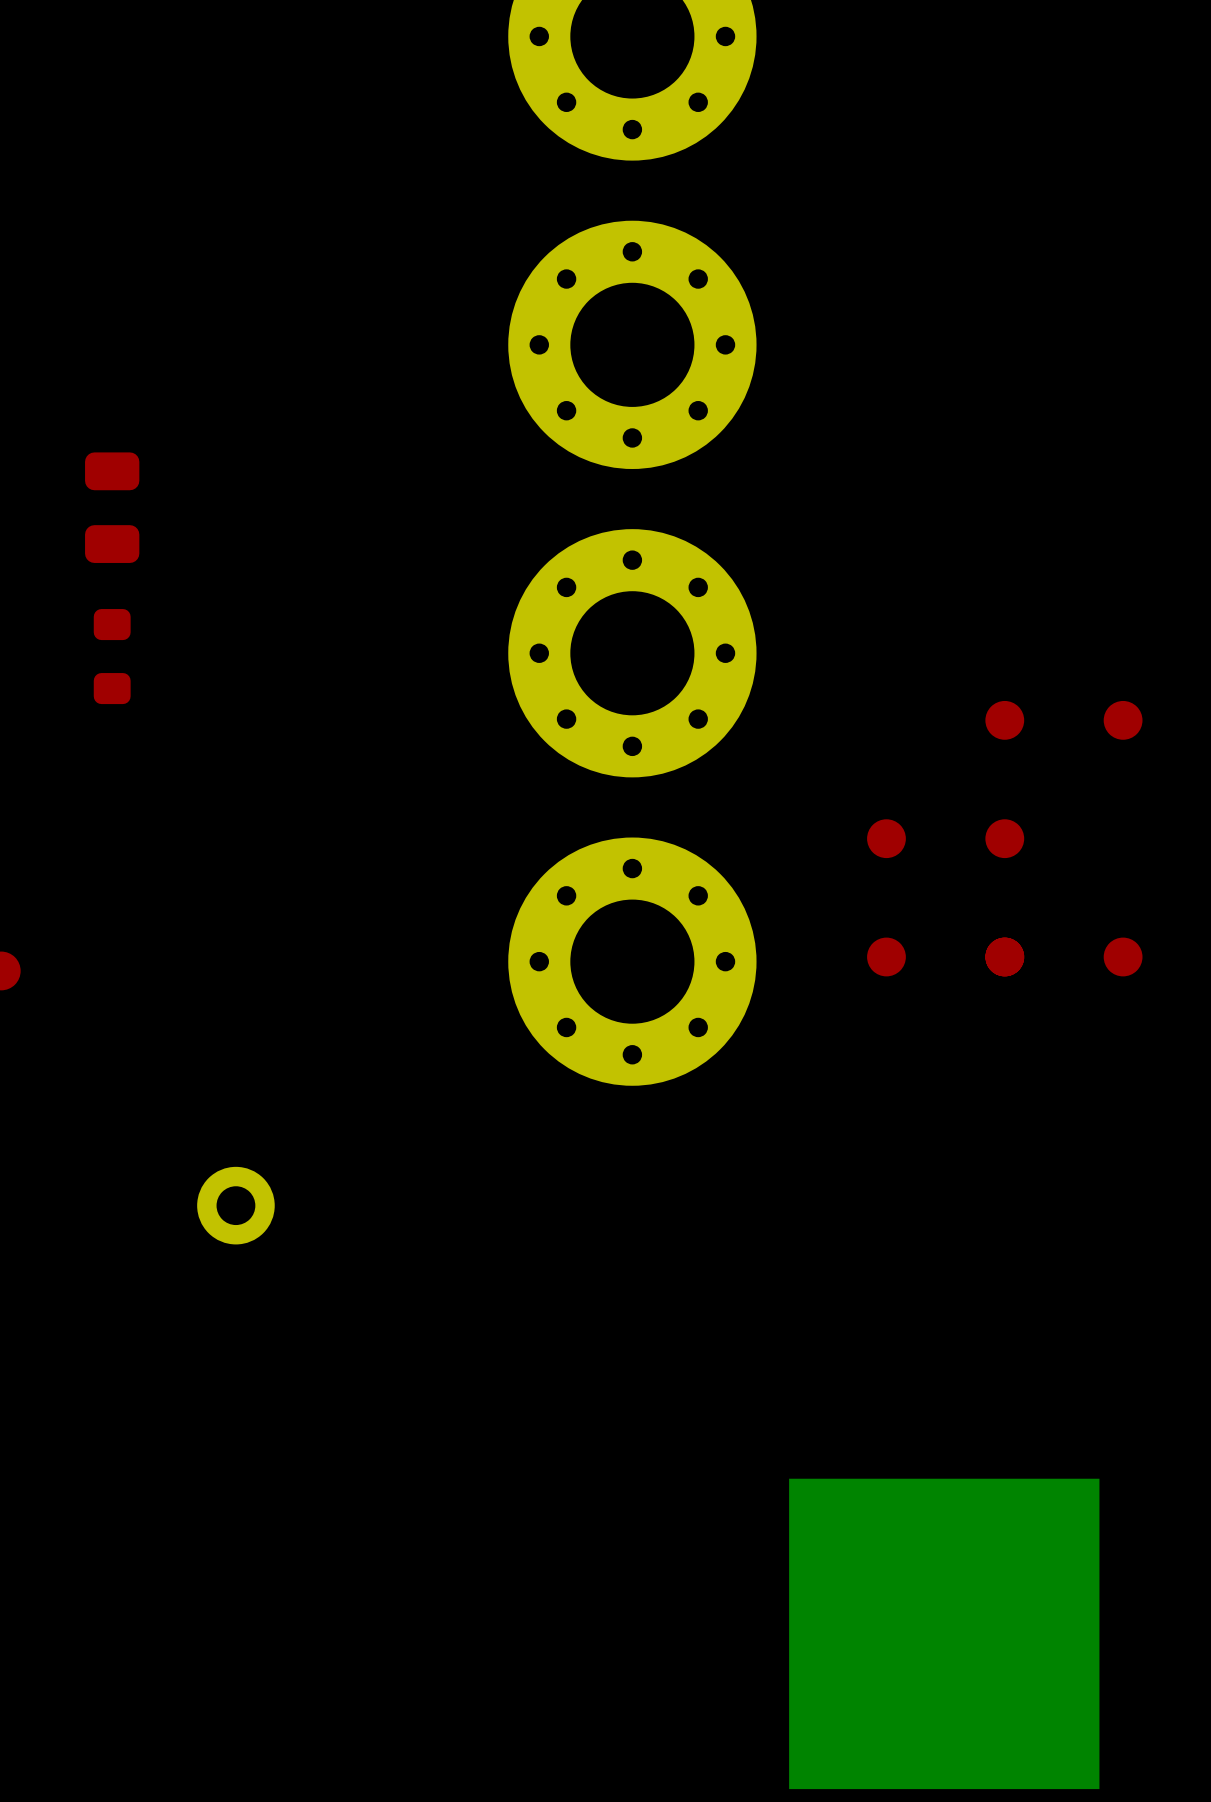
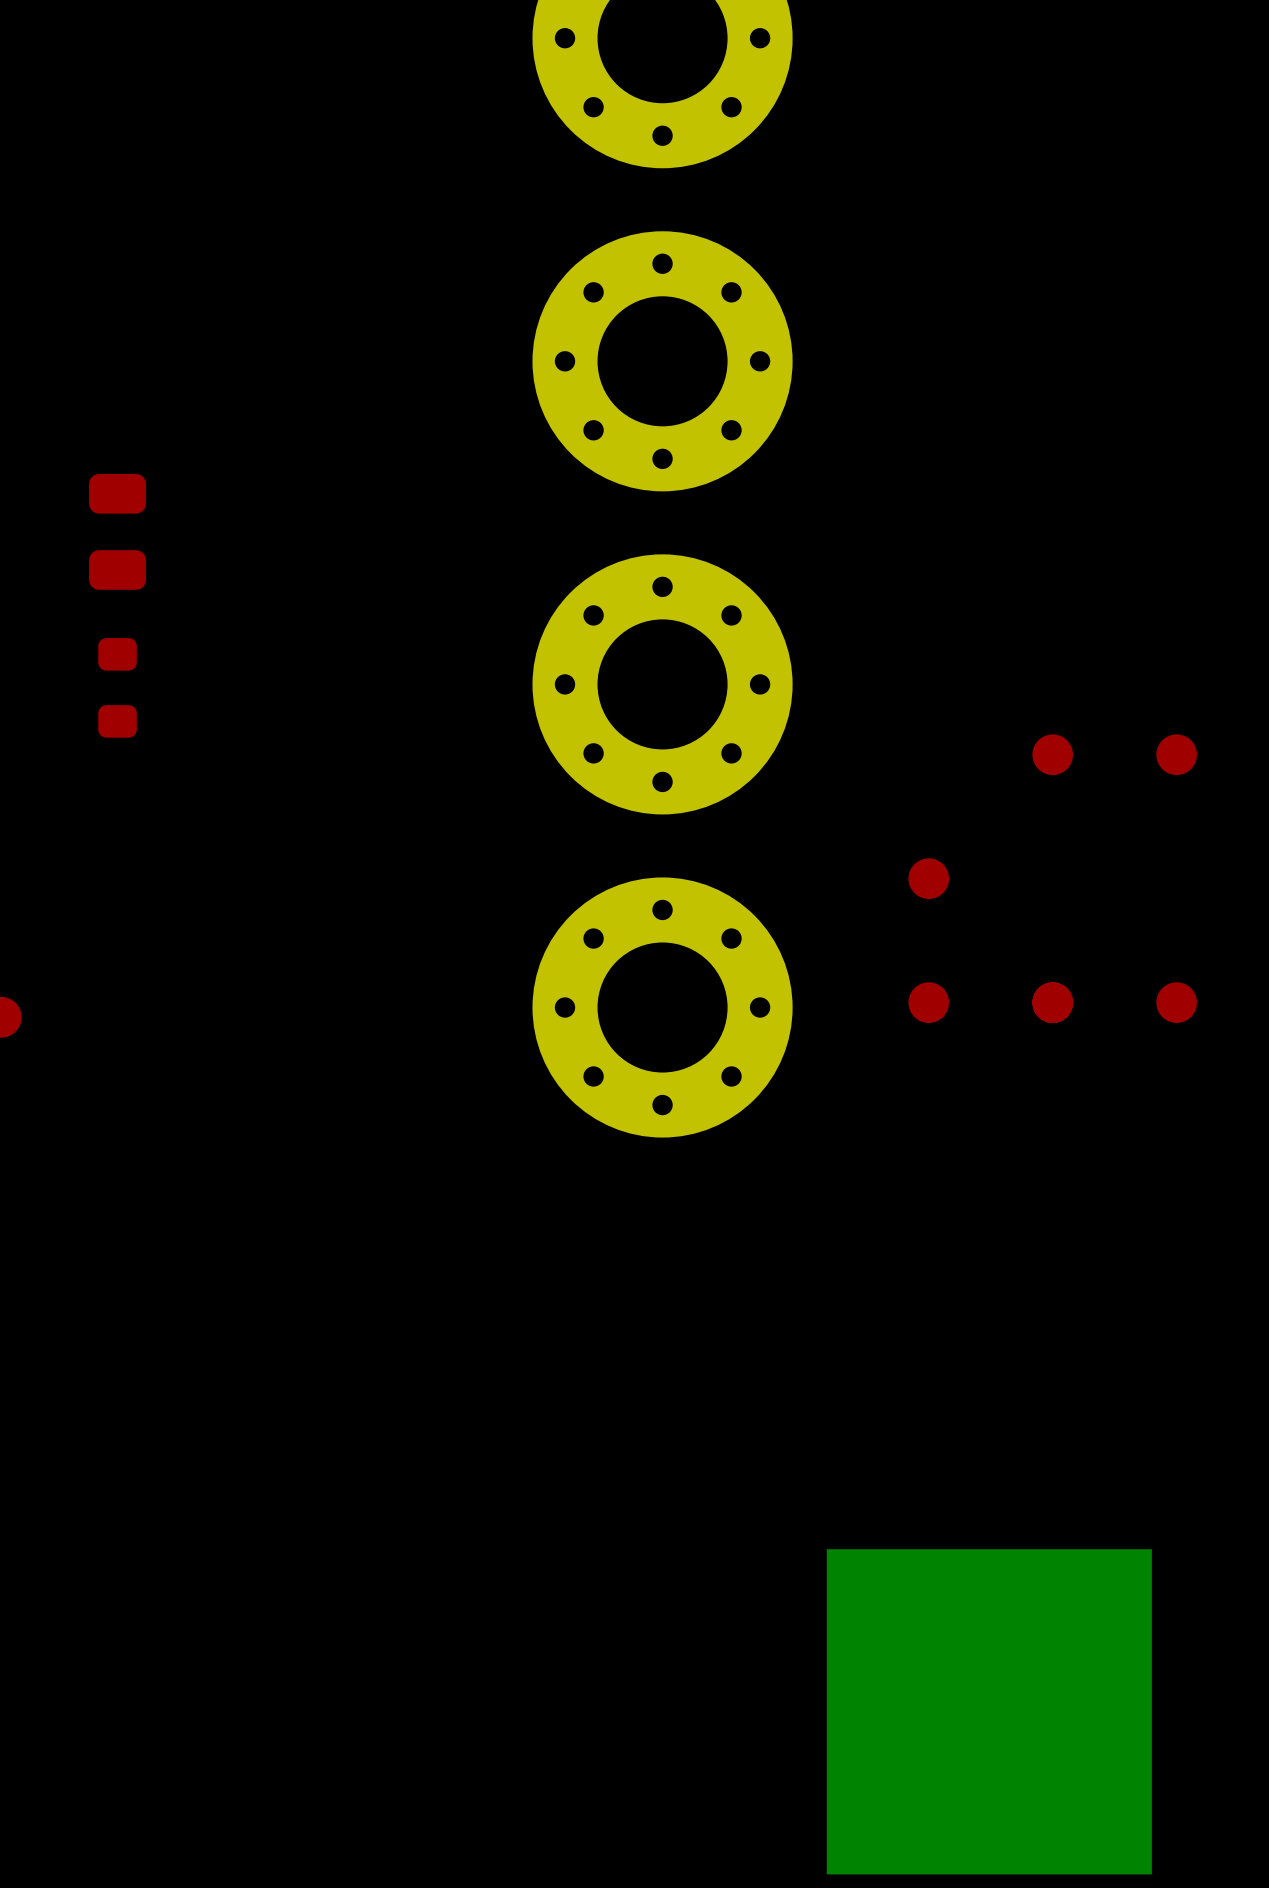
part: (1004, 838) -> none
part: (235, 1205) -> none

